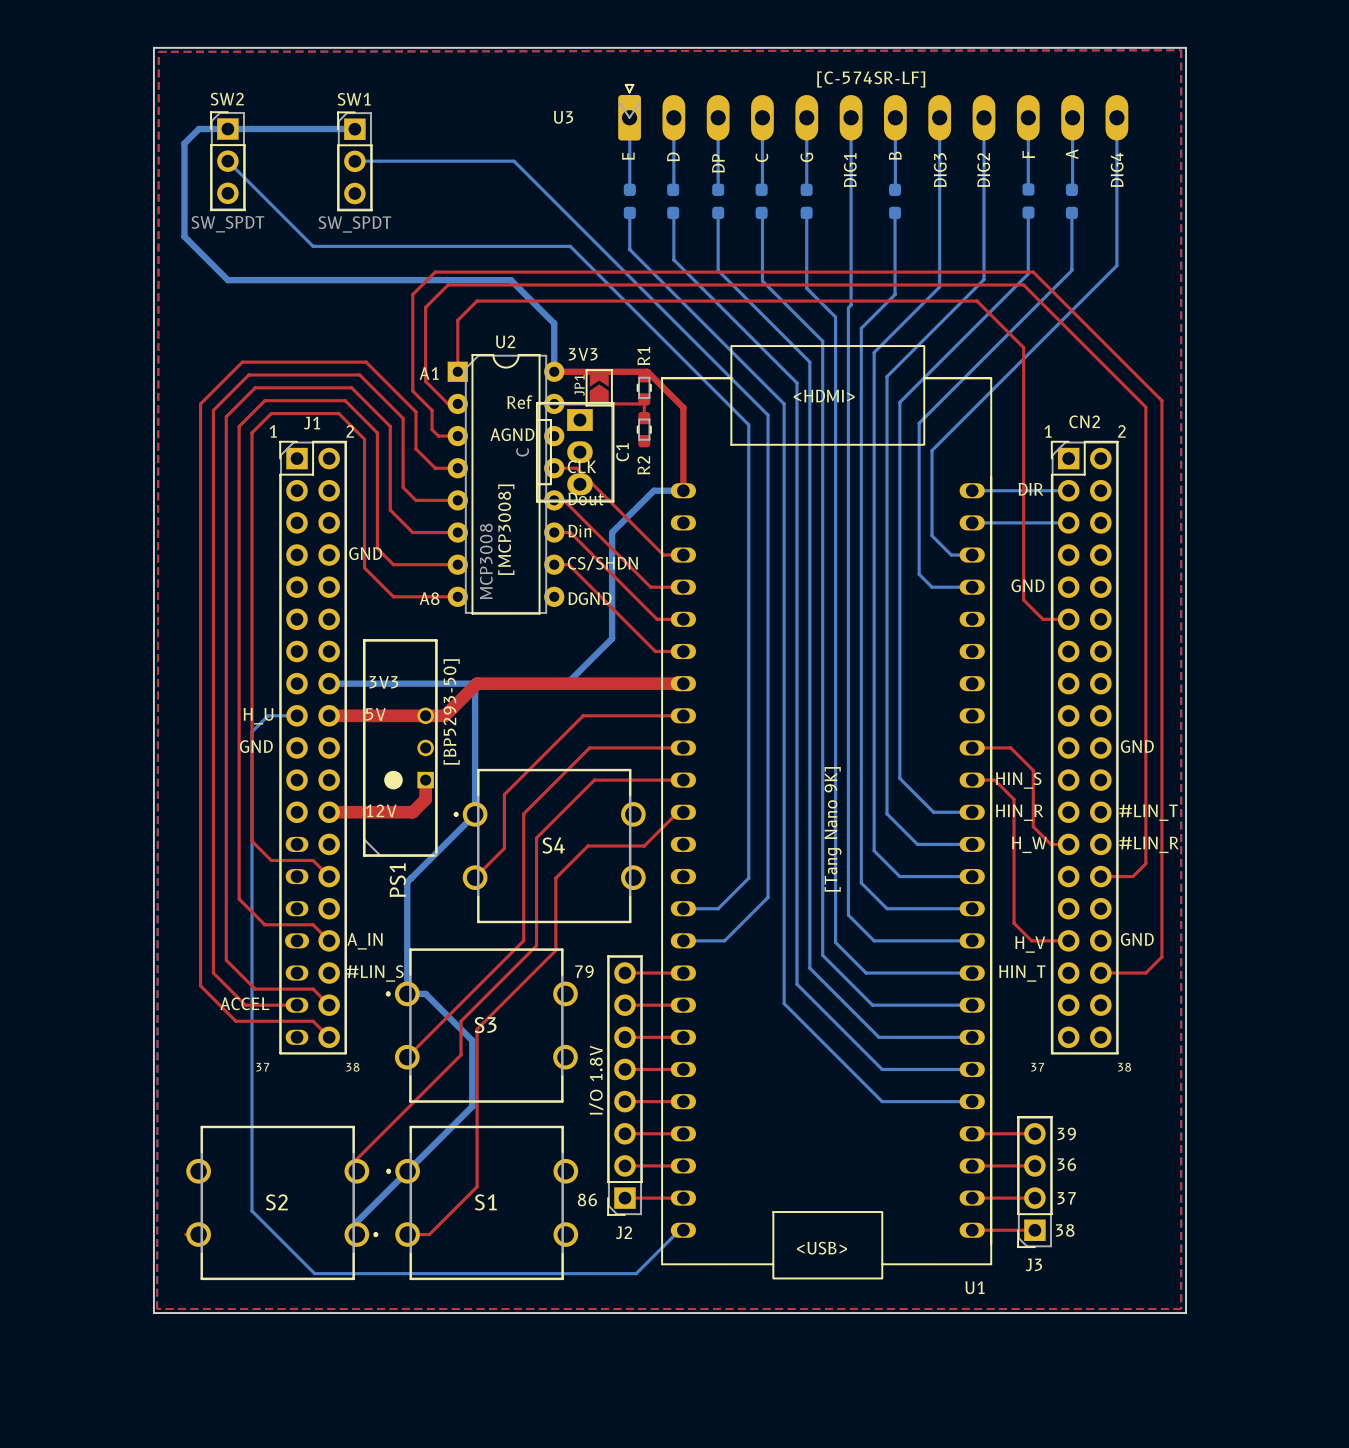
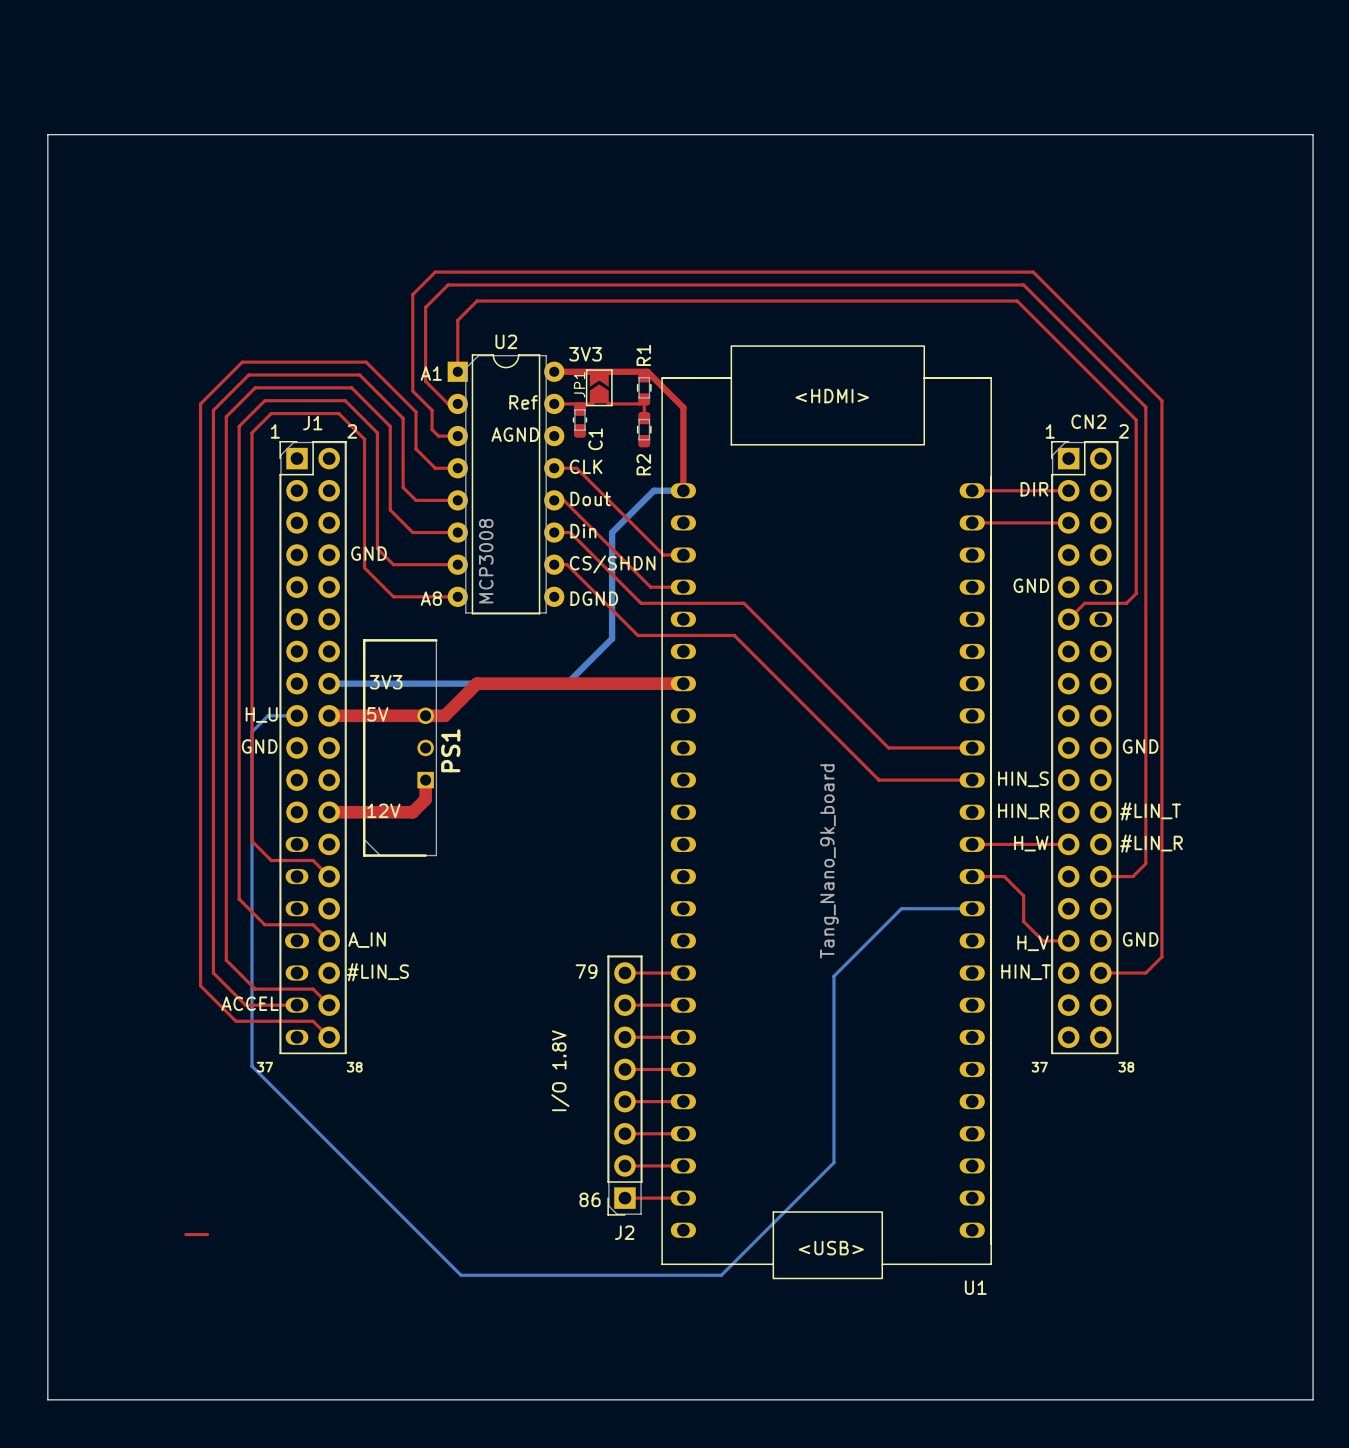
board edge: (153, 47) (1186, 47) (1186, 1313) (153, 1313) (153, 47) -> (47, 134) (47, 1399) (1313, 1399) (1313, 134) (47, 134)
top zone outline: (1181, 50) (158, 51) (157, 1309) (1181, 1309) (1181, 50) -> none
text: [C-574SR-LF] (871, 79) -> none
U3: (873, 112) -> none
bottom track: (629, 117) (629, 189) -> none
bottom track: (673, 117) (673, 189) -> none
bottom track: (718, 117) (718, 189) -> none
bottom track: (762, 117) (763, 189) -> none
bottom track: (806, 117) (806, 189) -> none
bottom track: (851, 117) (851, 305) (848, 307) (848, 915) (874, 940) (972, 940) -> none
bottom track: (895, 117) (895, 189) -> none
bottom track: (939, 117) (939, 286) (874, 352) (874, 850) (899, 876) (972, 876) -> none
bottom track: (983, 117) (983, 279) (887, 376) (887, 813) (917, 844) (972, 844) -> none
bottom track: (1028, 117) (1028, 189) -> none
bottom track: (1072, 117) (1071, 189) -> none
bottom track: (1116, 117) (1116, 265) (932, 450) (932, 535) (951, 555) (972, 555) -> none
bottom track: (354, 129) (198, 129) (184, 143) (184, 236) (227, 280) (510, 280) (554, 323) (554, 371) -> none
text: F (1028, 154) -> none
text: A (1072, 154) -> none
text: B (895, 155) -> none
text: E (628, 156) -> none
text: D (673, 156) -> none
text: C (761, 157) -> none
text: G (806, 157) -> none
bottom track: (227, 161) (313, 246) (570, 246) (748, 424) (748, 878) (718, 908) (683, 908) -> none
SW2: SW_SPDT (227, 161) -> none
SW1: SW_SPDT (354, 161) -> none
bottom track: (356, 161) (514, 161) (768, 415) (768, 897) (724, 940) (683, 940) -> none
text: DP (718, 163) -> none
text: DIG4 (1117, 169) -> none
text: DIG1 (850, 170) -> none
text: DIG3 (940, 170) -> none
text: DIG2 (983, 170) -> none
part: (629, 201) -> none
part: (673, 201) -> none
part: (718, 201) -> none
part: (761, 201) -> none
part: (806, 201) -> none
part: (895, 201) -> none
part: (1028, 201) -> none
part: (1071, 201) -> none
bottom track: (629, 212) (629, 249) (784, 403) (784, 1003) (882, 1101) (972, 1101) -> none
bottom track: (673, 212) (673, 259) (796, 383) (796, 984) (882, 1069) (972, 1069) -> none
bottom track: (718, 212) (718, 270) (809, 362) (809, 968) (878, 1037) (972, 1037) -> none
bottom track: (763, 212) (762, 280) (822, 341) (822, 955) (872, 1005) (972, 1005) -> none
bottom track: (895, 212) (895, 294) (861, 328) (861, 882) (887, 908) (901, 908) -> none
bottom track: (1028, 212) (1028, 273) (899, 402) (899, 778) (933, 812) (972, 812) -> none
bottom track: (1071, 212) (1071, 270) (919, 423) (919, 574) (932, 587) (972, 587) -> none
bottom track: (806, 213) (806, 288) (835, 317) (835, 942) (866, 973) (972, 973) -> none
top track: (977, 301) (1023, 347) (1023, 600) (1042, 619) (1068, 619) -> (977, 301) (1017, 301) (1136, 420) (1136, 593) (1126, 603) (1084, 603) (1068, 619)
C1 footprint: [536, 402, 615, 503] -> [572, 402, 588, 438]
J1 footprint: [279, 440, 1119, 1055] -> [279, 440, 1119, 1055]
C1 value: C (522, 452) -> none
C1 name position: C1 (622, 452) -> C1 (595, 439)
bottom track: (972, 490) (1068, 490) -> none
top track: none -> (972, 490) (1068, 490)
bottom track: (972, 522) (1068, 522) -> none
top track: none -> (972, 522) (1068, 522)
text: [MCP3008] (506, 529) -> none
top track: (567, 564) (655, 651) (683, 651) -> (567, 564) (637, 635) (734, 635) (878, 780) (972, 780)
top track: (641, 603) (657, 619) (683, 619) -> (641, 603) (743, 603) (888, 747) (972, 747)
PS1 footprint: [362, 639, 438, 857] -> [362, 639, 438, 857]
bottom track: (473, 683) (475, 814) (411, 878) -> none
text: [BP5293-50] (451, 711) -> none
top track: (683, 715) (583, 715) (504, 794) (504, 848) (475, 877) -> none
top track: (683, 747) (589, 747) (523, 813) (523, 940) (407, 1057) -> none
top track: (972, 747) (1010, 747) (1033, 770) (1033, 826) (1050, 844) -> (972, 844) (1050, 844)
top track: (683, 780) (594, 780) (536, 837) (536, 945) (460, 1021) (460, 1055) (356, 1159) (356, 1171) -> none
top track: (972, 780) (994, 780) (1014, 799) (1014, 923) (1031, 940) (1042, 940) -> (972, 876) (1004, 876) (1023, 895) (1023, 921) (1042, 940)
top track: (683, 812) (678, 812) (644, 846) (588, 846) (555, 878) (555, 950) (477, 1029) (477, 1186) (429, 1234) (407, 1234) -> none
text: [Tang Nano 9K] (833, 829) -> none
S4: (549, 846) -> none
U1 value: none -> Tang_Nano_9k_board (829, 861)
bottom track: (411, 878) (407, 882) (407, 993) (425, 993) (472, 1040) (472, 1106) (356, 1222) (356, 1234) -> none
PS1 name position: PS1 (397, 880) -> PS1 (450, 750)
S3: (481, 1025) -> none
bottom track: (252, 1066) (252, 1210) (314, 1273) (636, 1273) (679, 1230) (683, 1230) -> (252, 1066) (460, 1275) (721, 1275) (833, 1162) (833, 976) (901, 908)
text position: I/O 1.8V (596, 1080) -> I/O 1.8V (560, 1070)
top track: (972, 1133) (1034, 1133) -> none
text: 39 (1066, 1134) -> none
text: 36 (1066, 1164) -> none
top track: (972, 1165) (1034, 1165) -> none
J3: (1034, 1182) -> none
top track: (972, 1198) (1034, 1198) -> none
text: 37 (1066, 1198) -> none
S2: (282, 1202) -> none
S1: (482, 1202) -> none
top track: (972, 1230) (1034, 1230) -> none
text: 38 (1065, 1230) -> none

